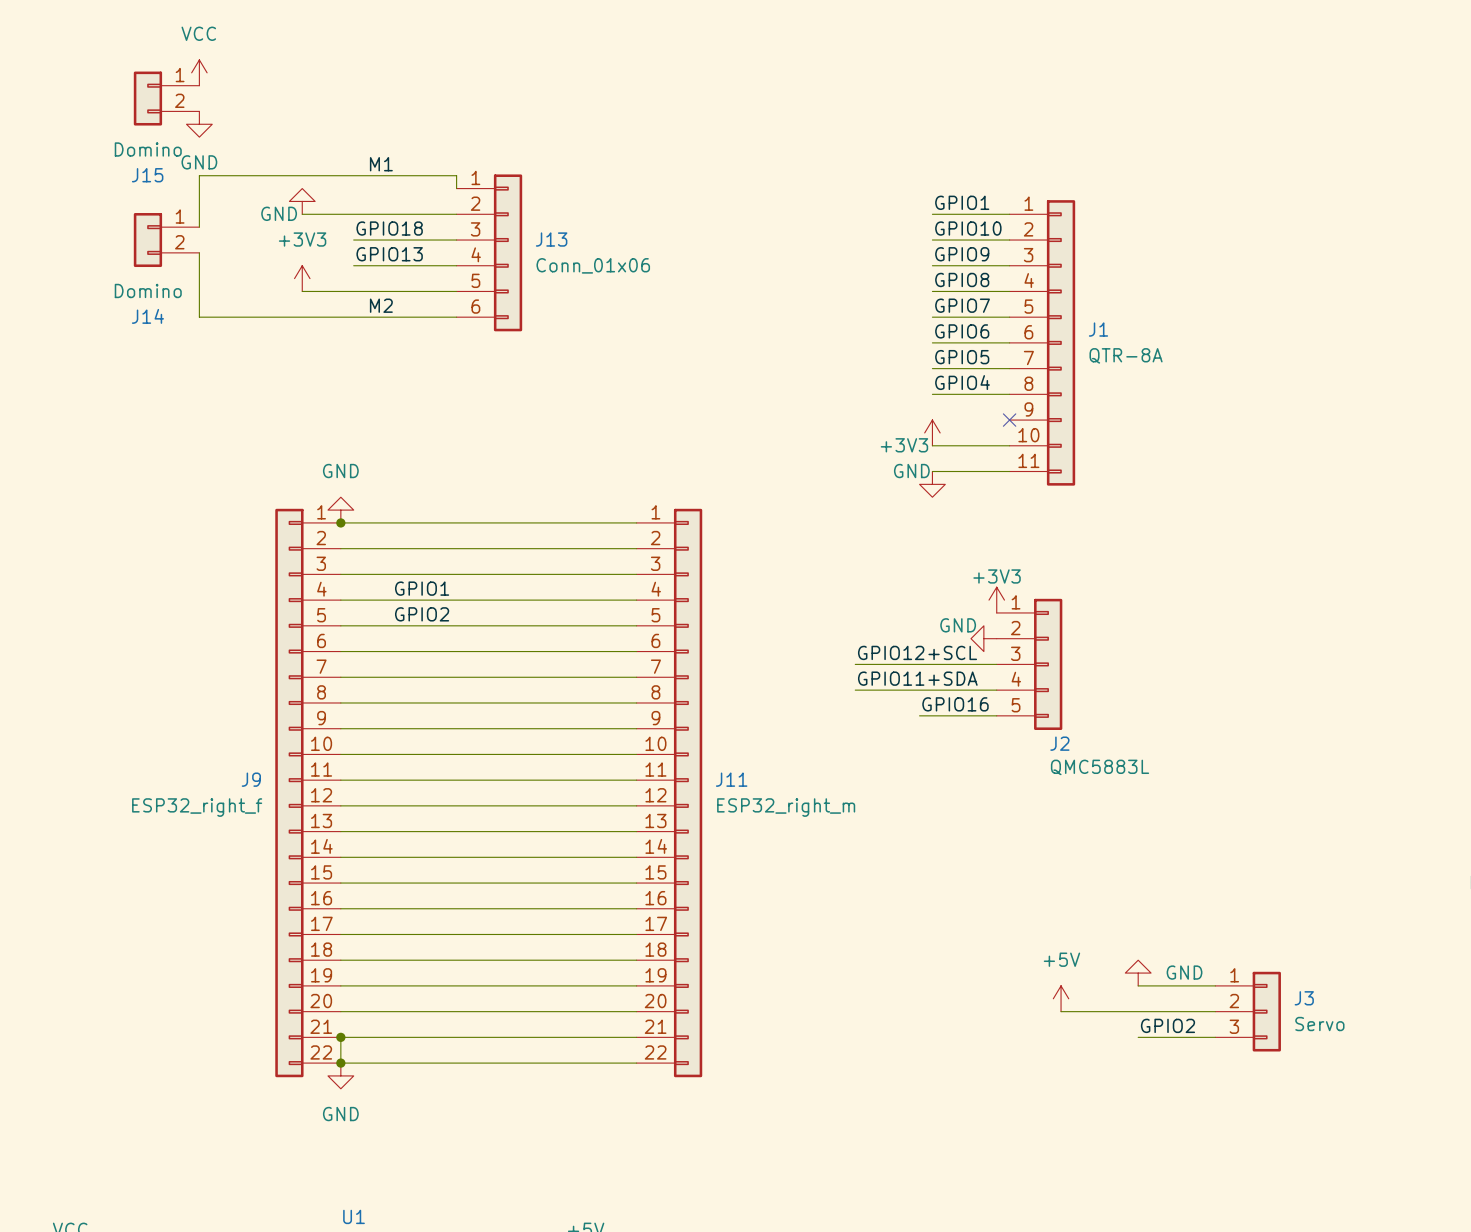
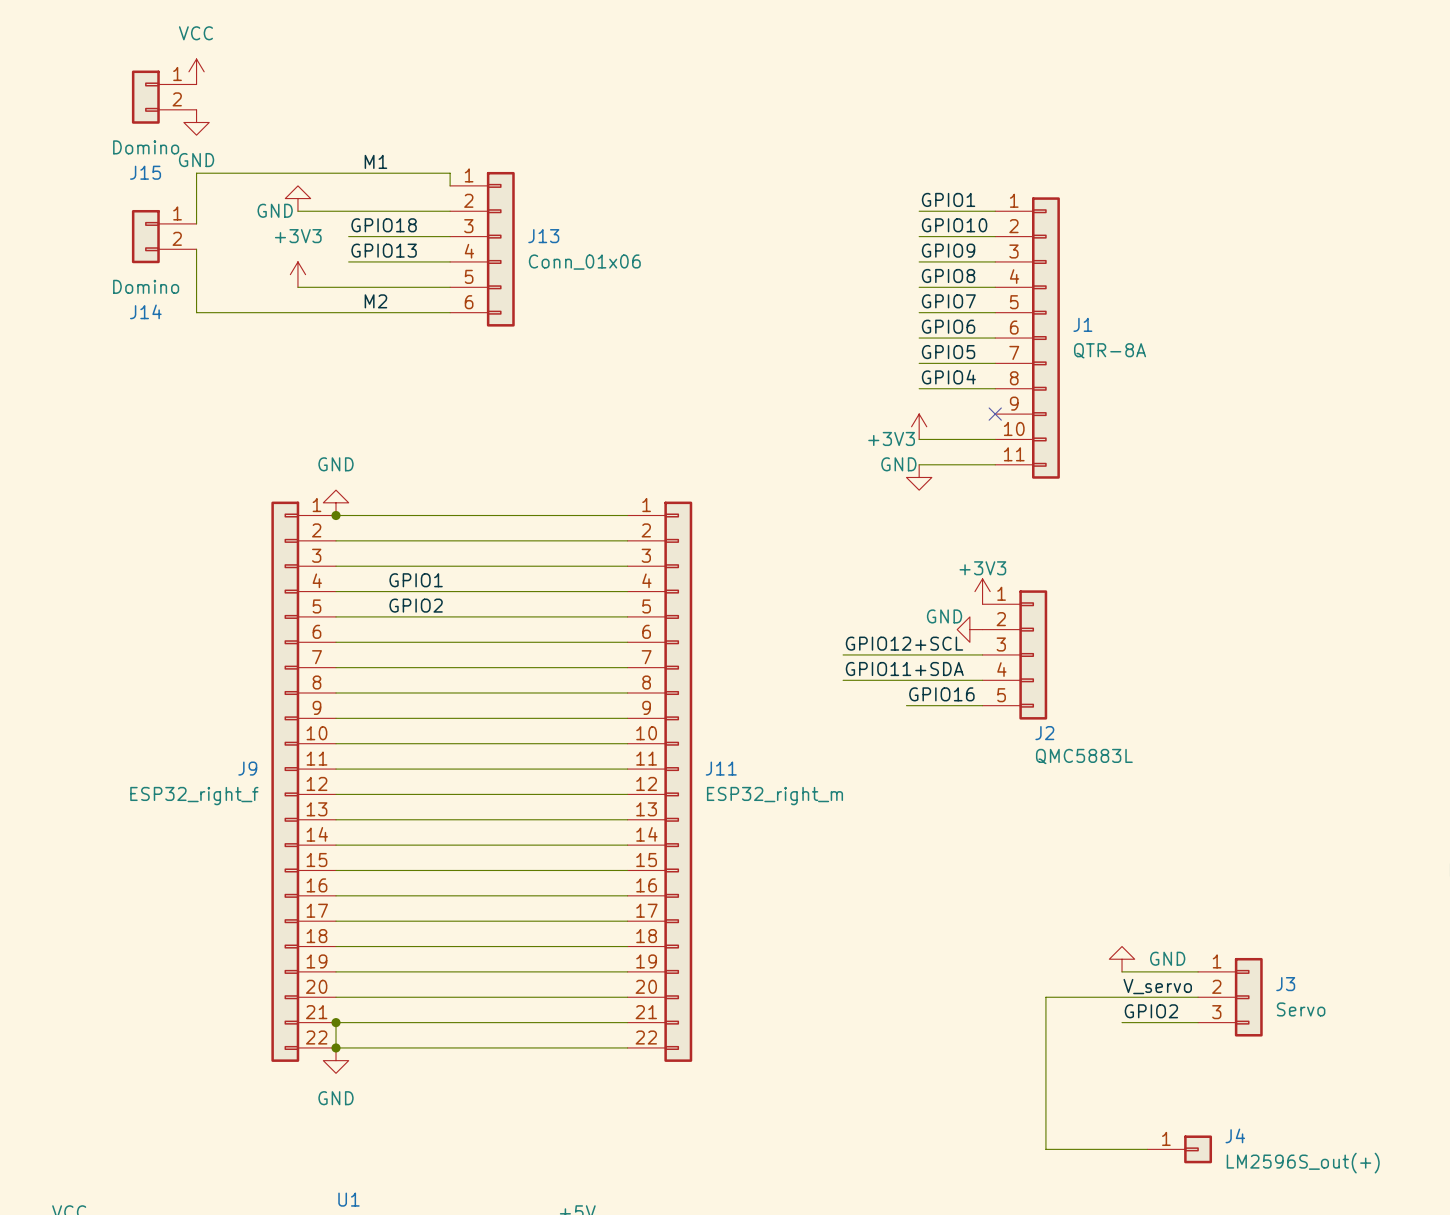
power symbol: +5V (1061, 998) -> none
label: none -> V_servo (1157, 986)
wire: none -> (1045, 997) (1045, 1149) (1147, 1149)
J4: none -> LM2596S_out(+) (1179, 1149)

